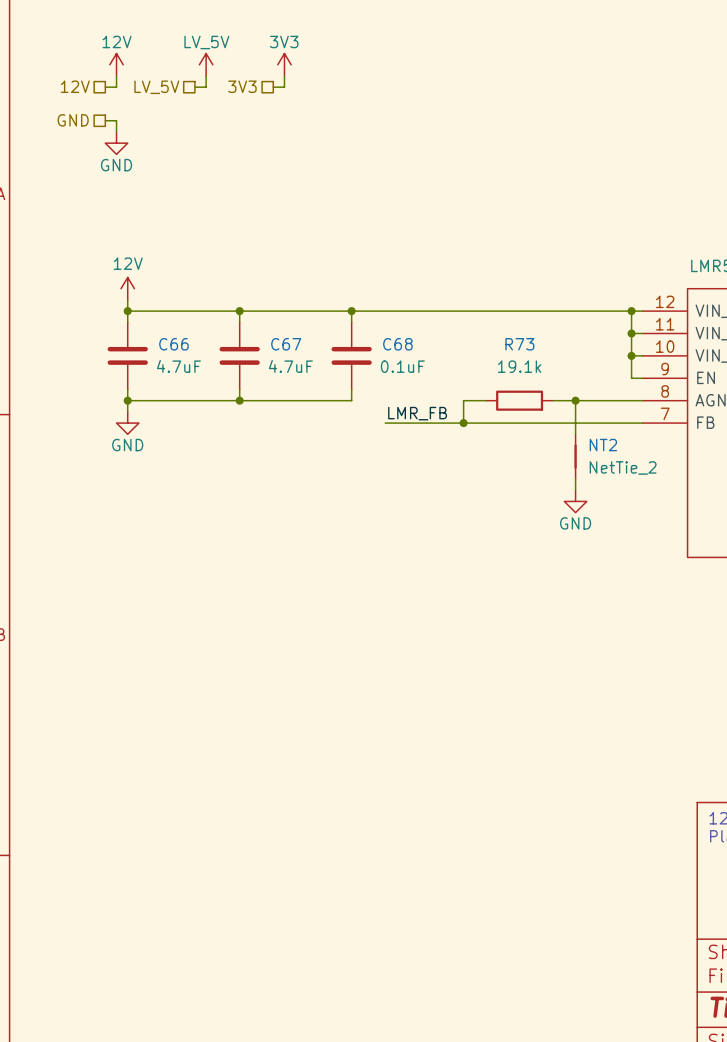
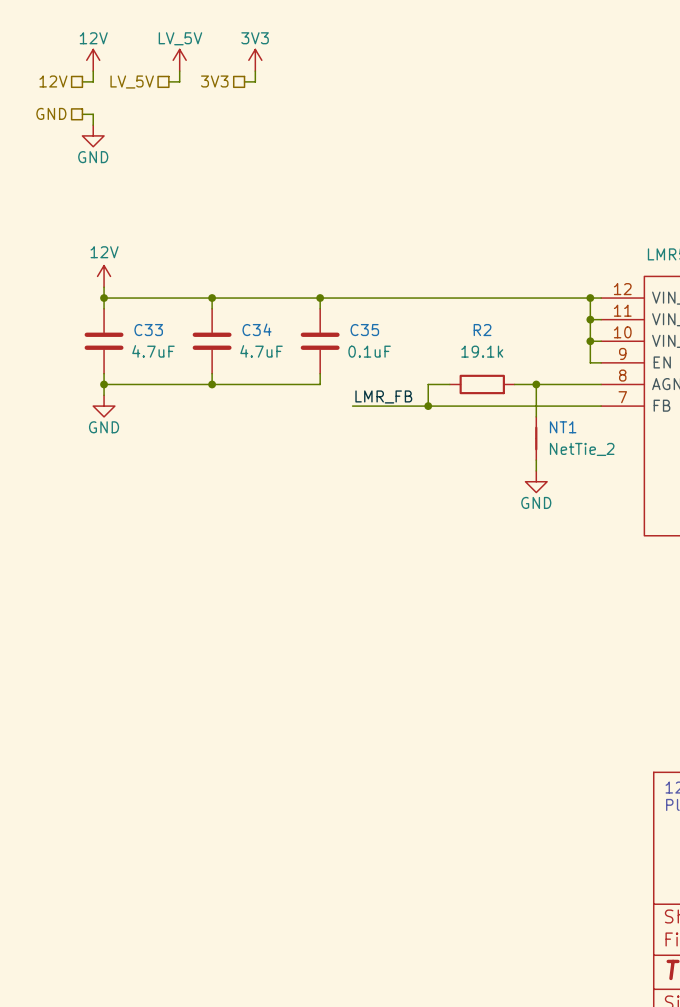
C66 name: C66 (173, 344) -> C33 (148, 330)
C67 name: C67 (286, 344) -> C34 (257, 329)
C68 name: C68 (397, 344) -> C35 (364, 330)
R73 name: R73 (519, 344) -> R2 (482, 330)
NT2 name: NT2 (603, 445) -> NT1 (563, 427)

